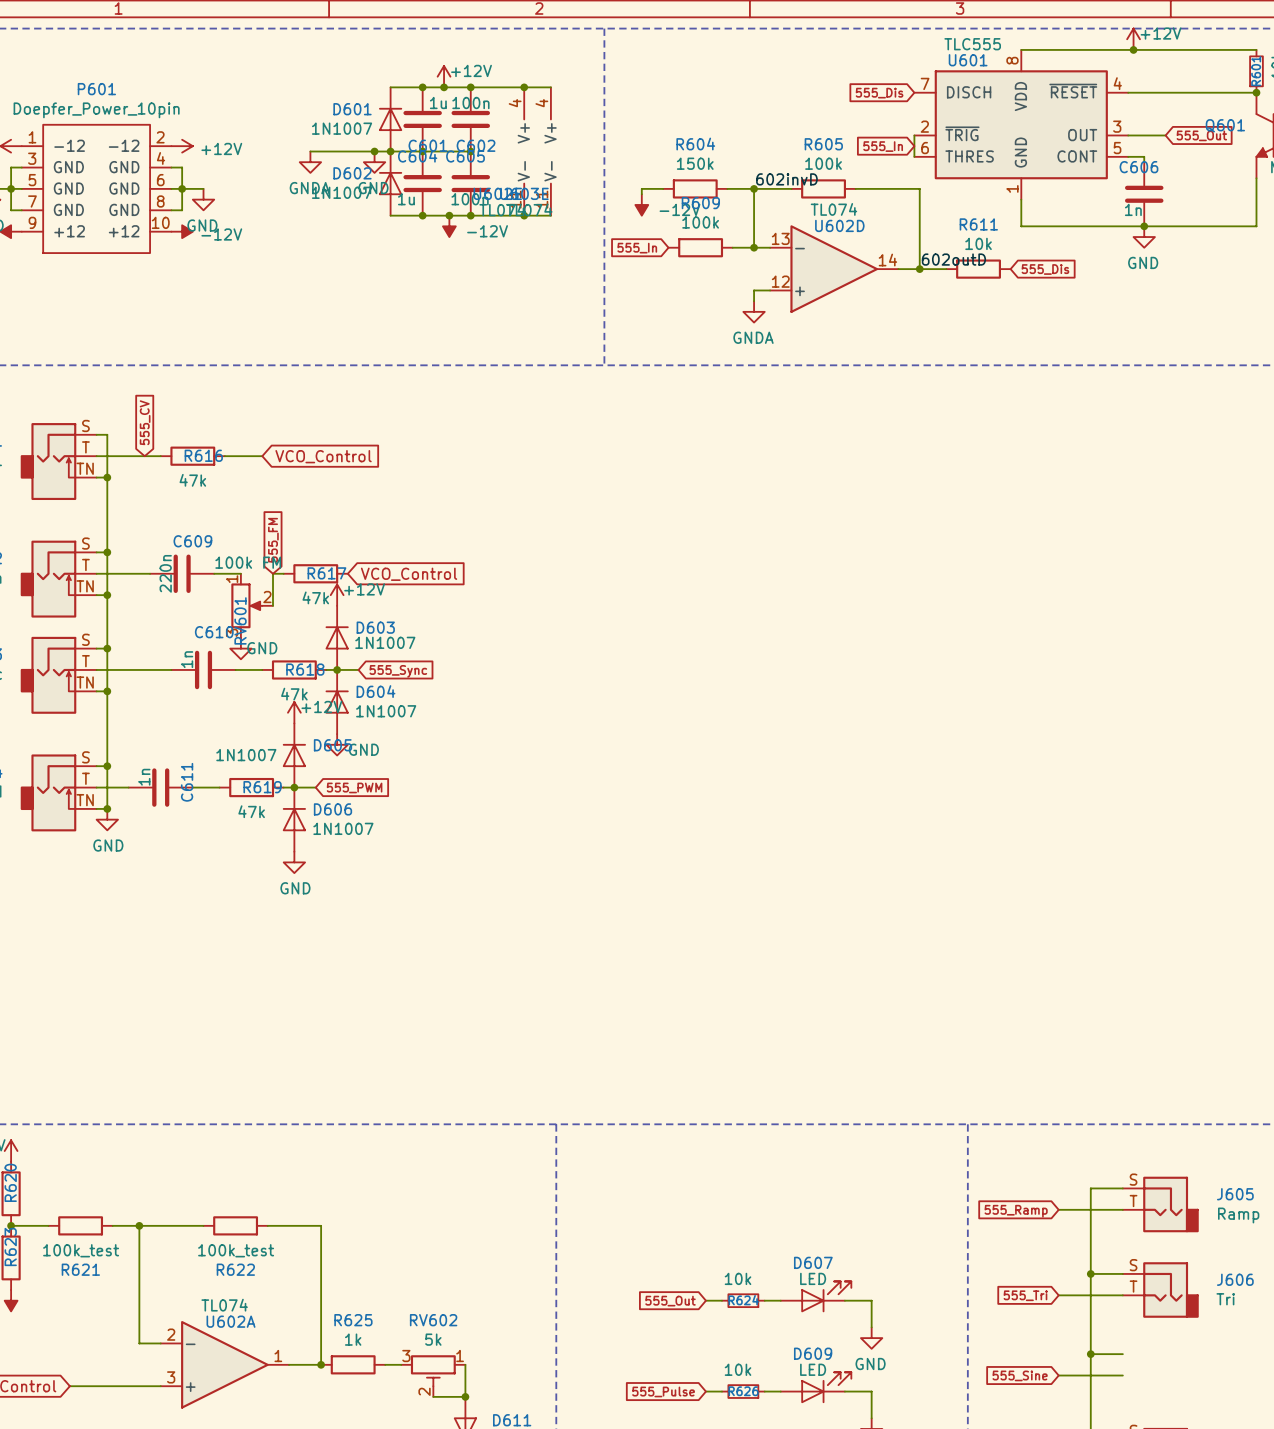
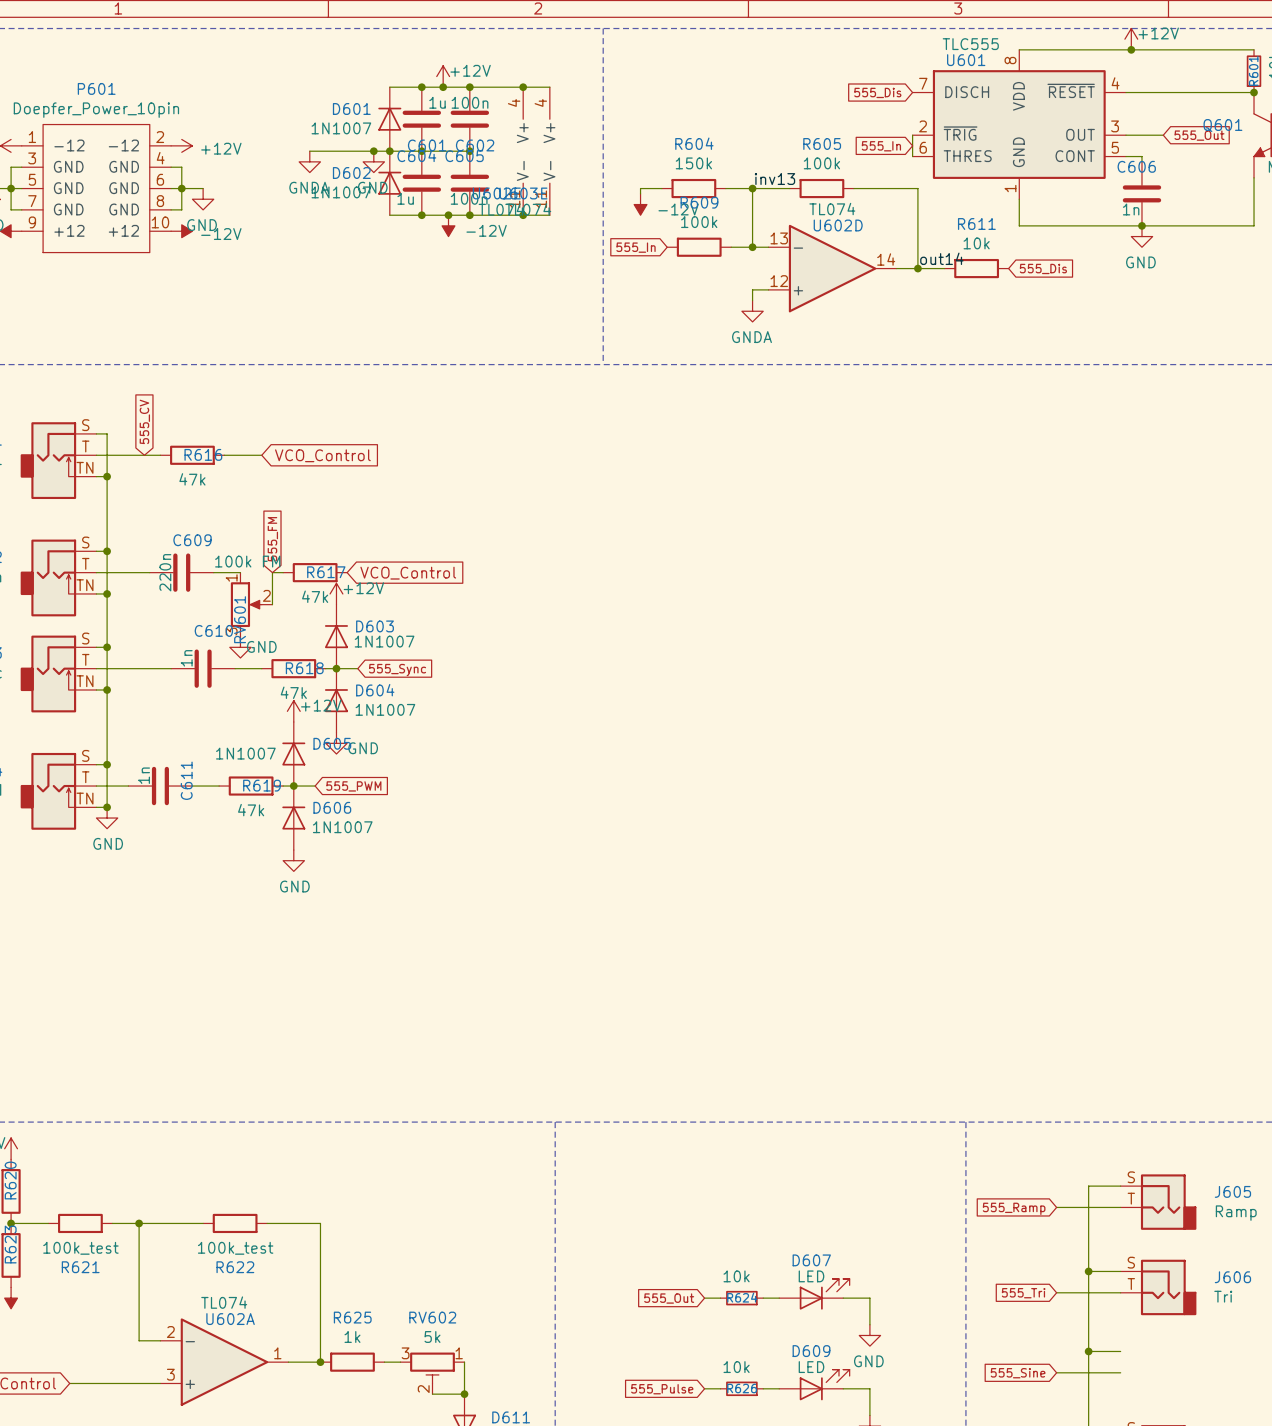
label: 602invD (786, 179) -> inv13 (775, 179)
label: 602outD (953, 259) -> out14 (941, 258)

